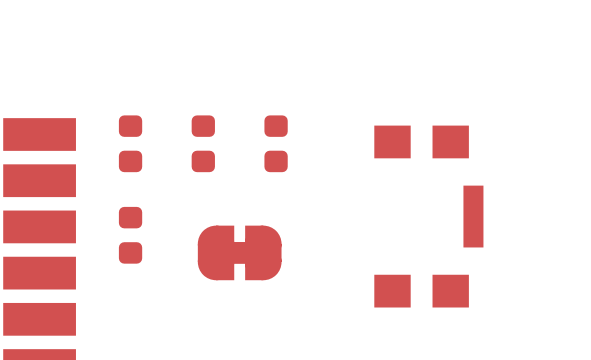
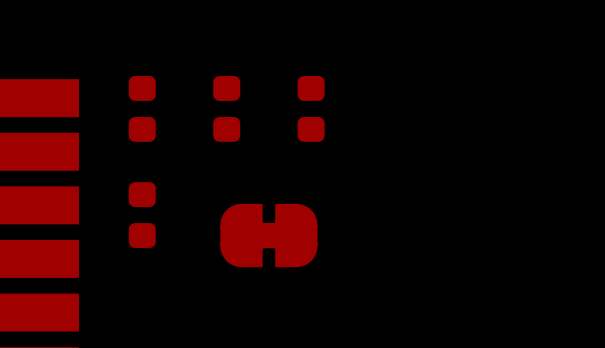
part: (428, 216) -> none

